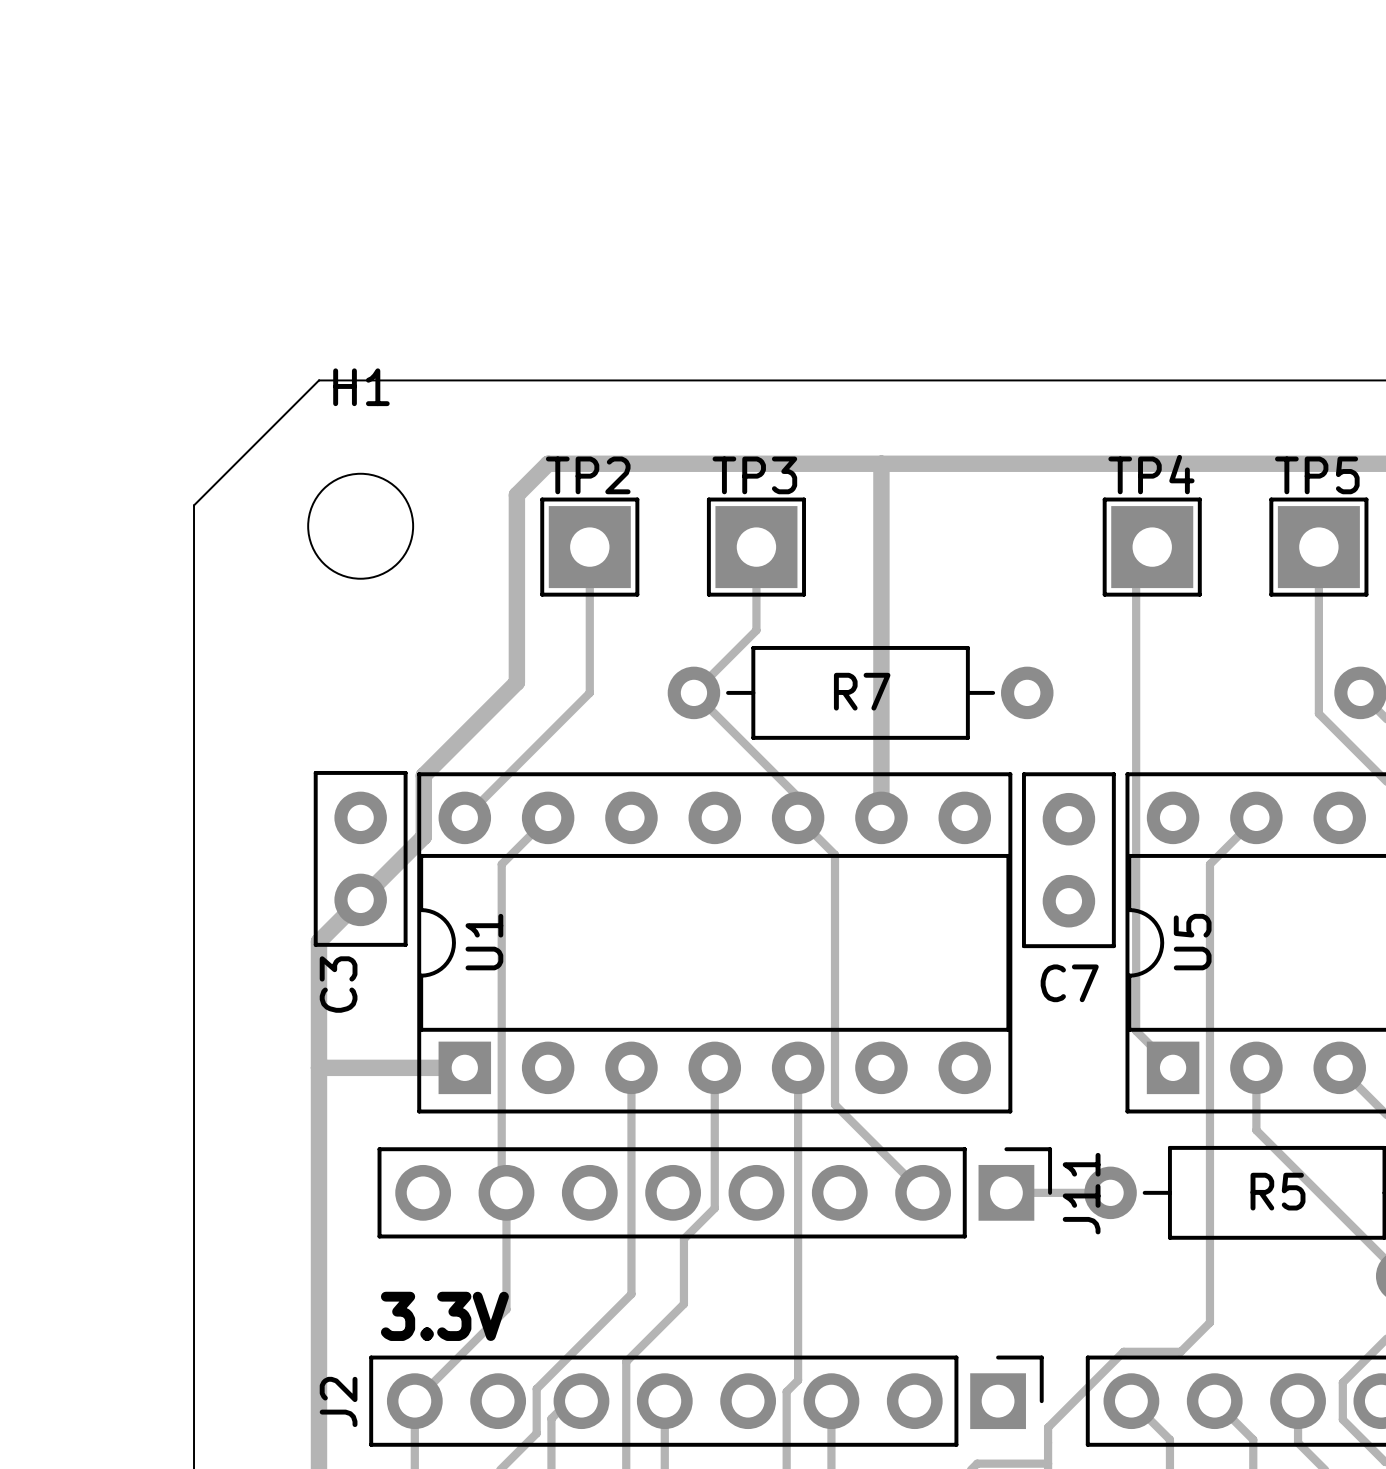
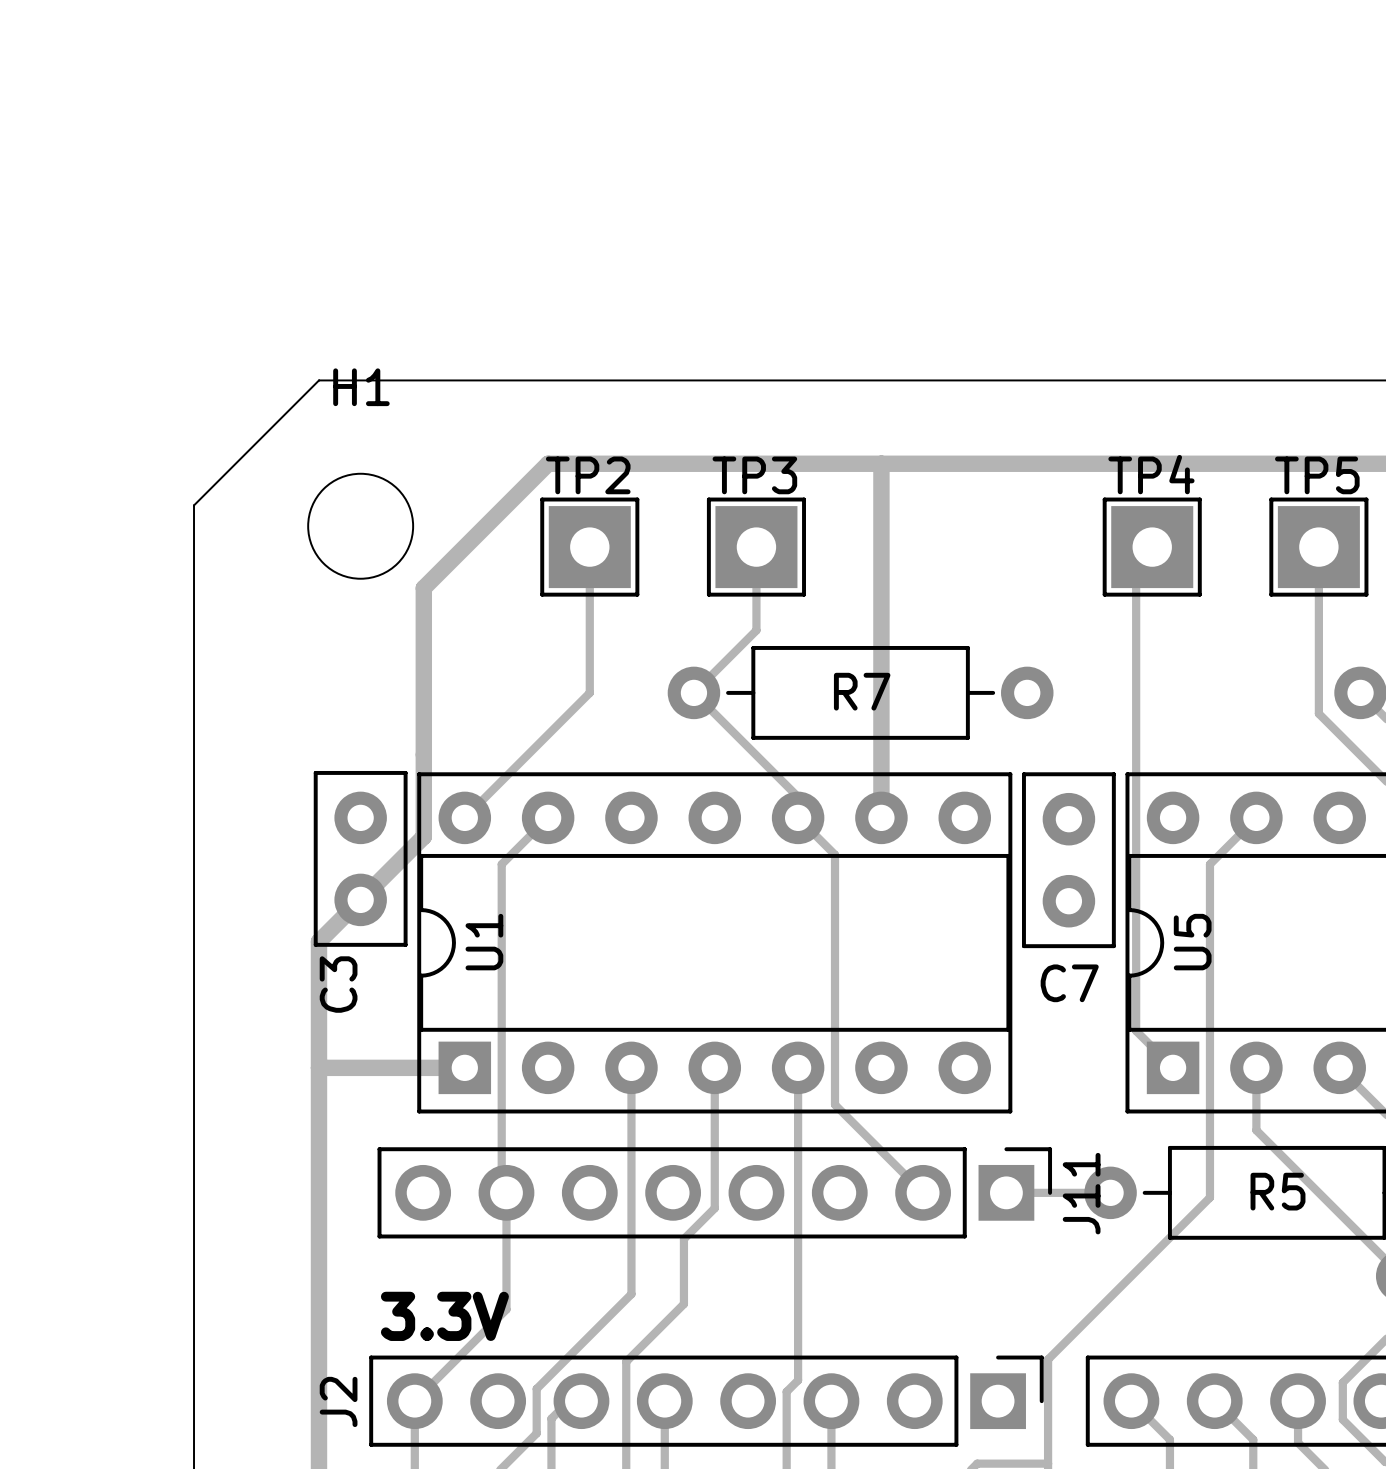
track: (516, 495) (516, 682) (423, 775) -> (516, 495) (423, 588) (423, 775)
track: (1209, 1197) (1209, 1322) (1180, 1351) (1123, 1351) (1048, 1427) -> (1209, 1197) (1048, 1359) (1048, 1427)

